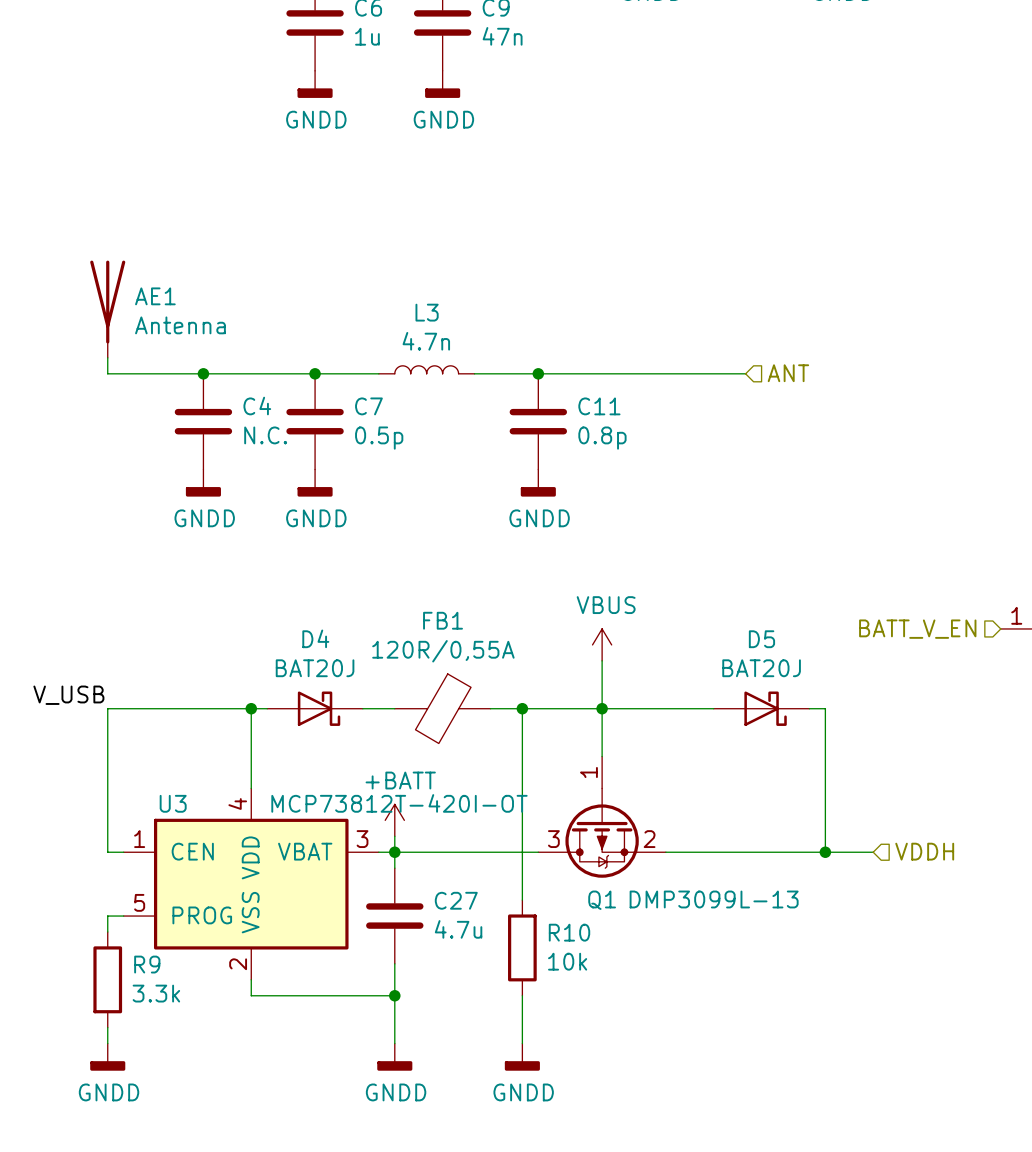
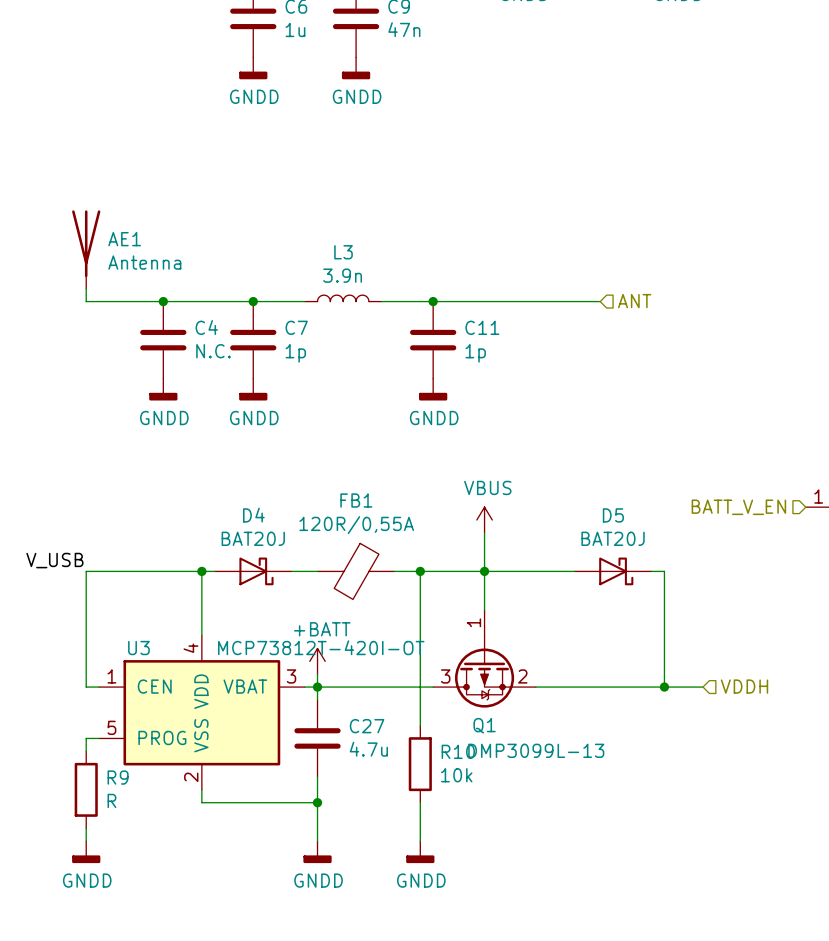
L3 value: 4.7n (426, 341) -> 3.9n (342, 275)
C7 value: 0.5p (379, 438) -> 1p (295, 353)
C11 value: 0.8p (602, 438) -> 1p (475, 353)
Q1 value position: DMP3099L-13 (714, 899) -> DMP3099L-13 (536, 750)
R9 value: 3.3k (156, 993) -> R (111, 800)

